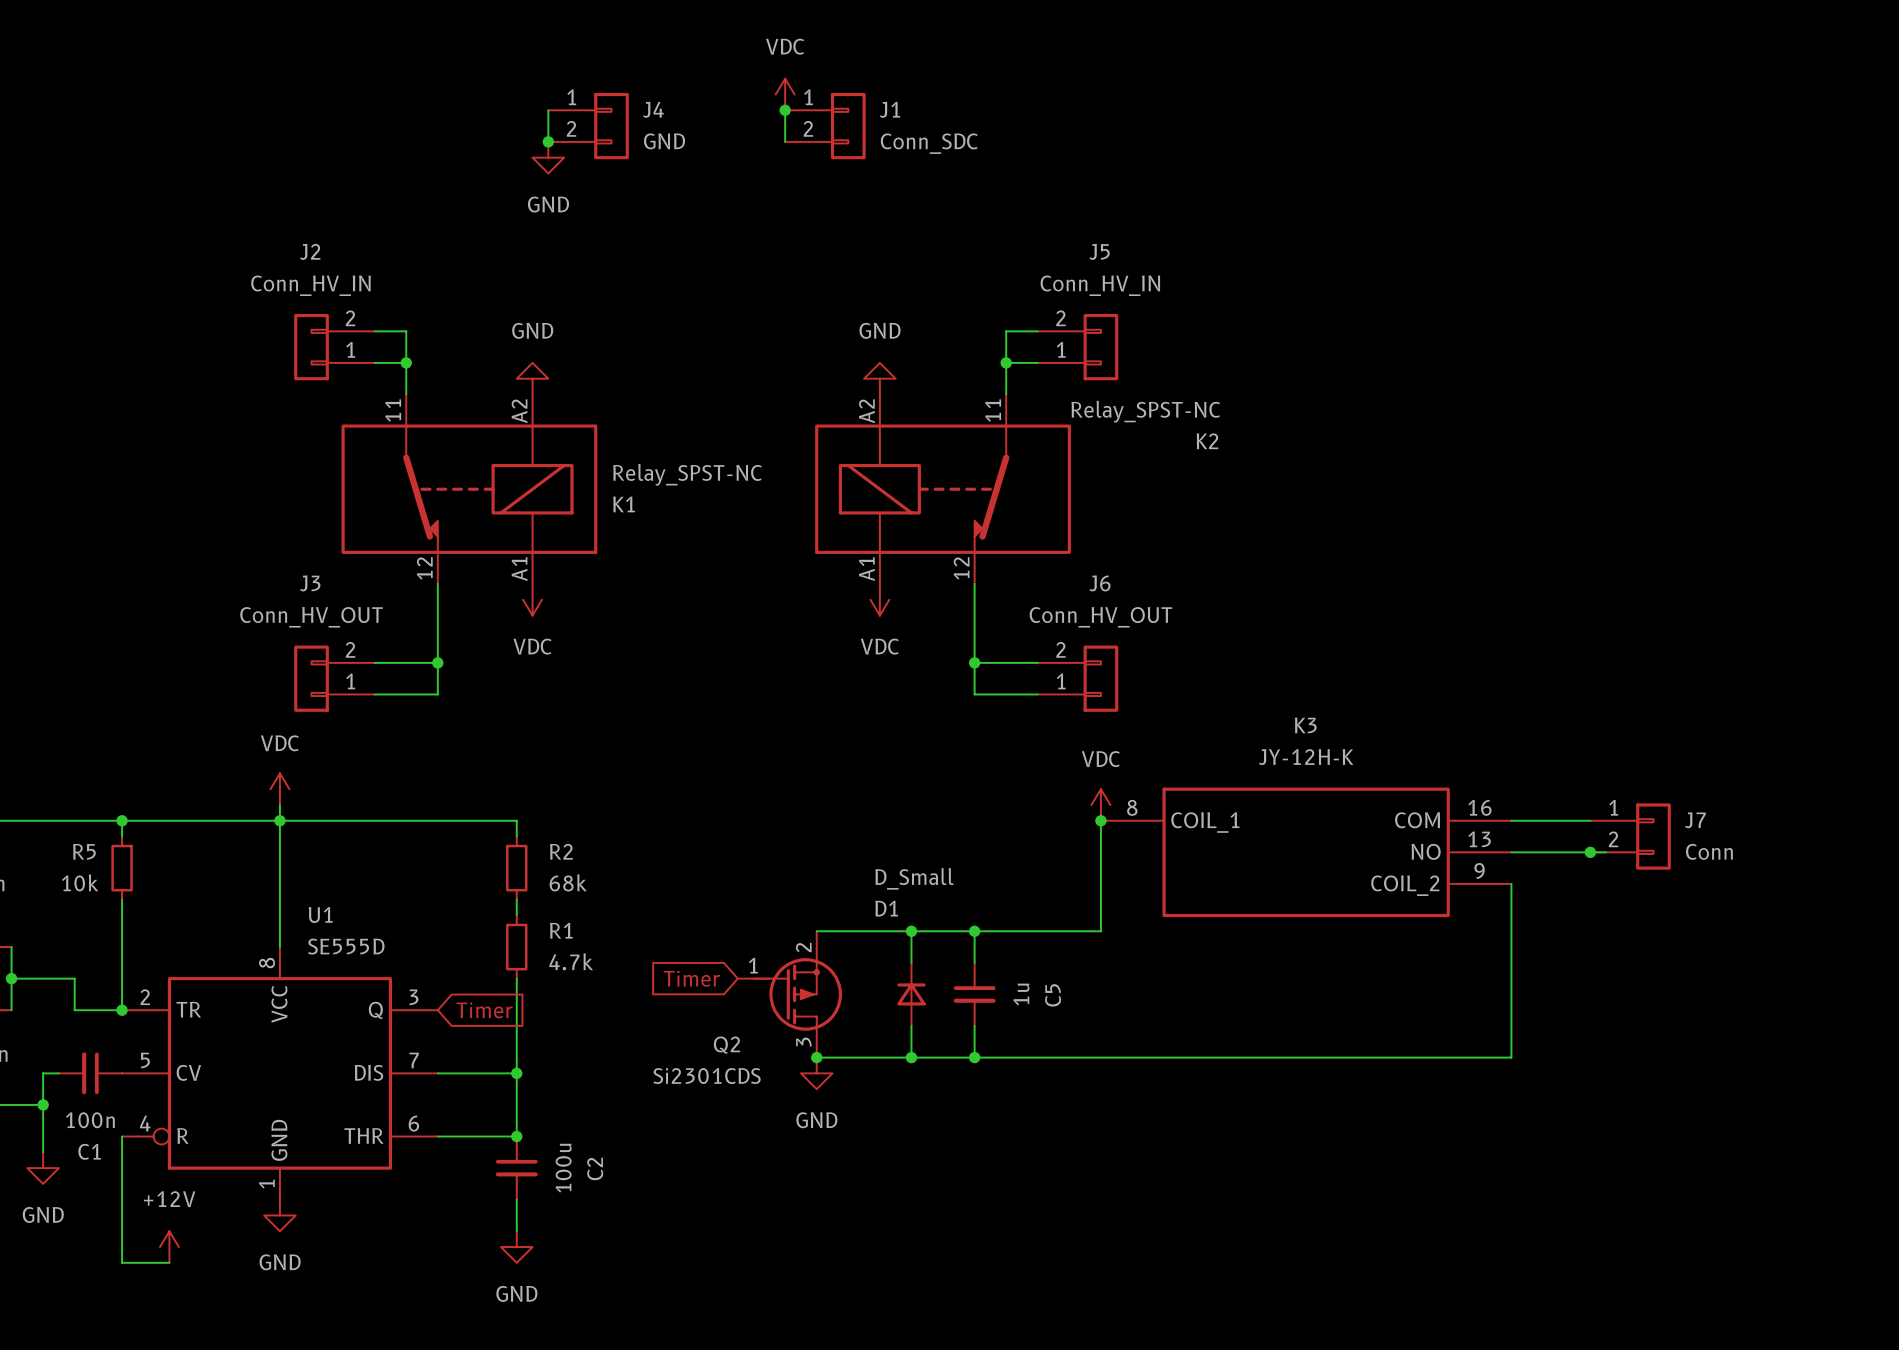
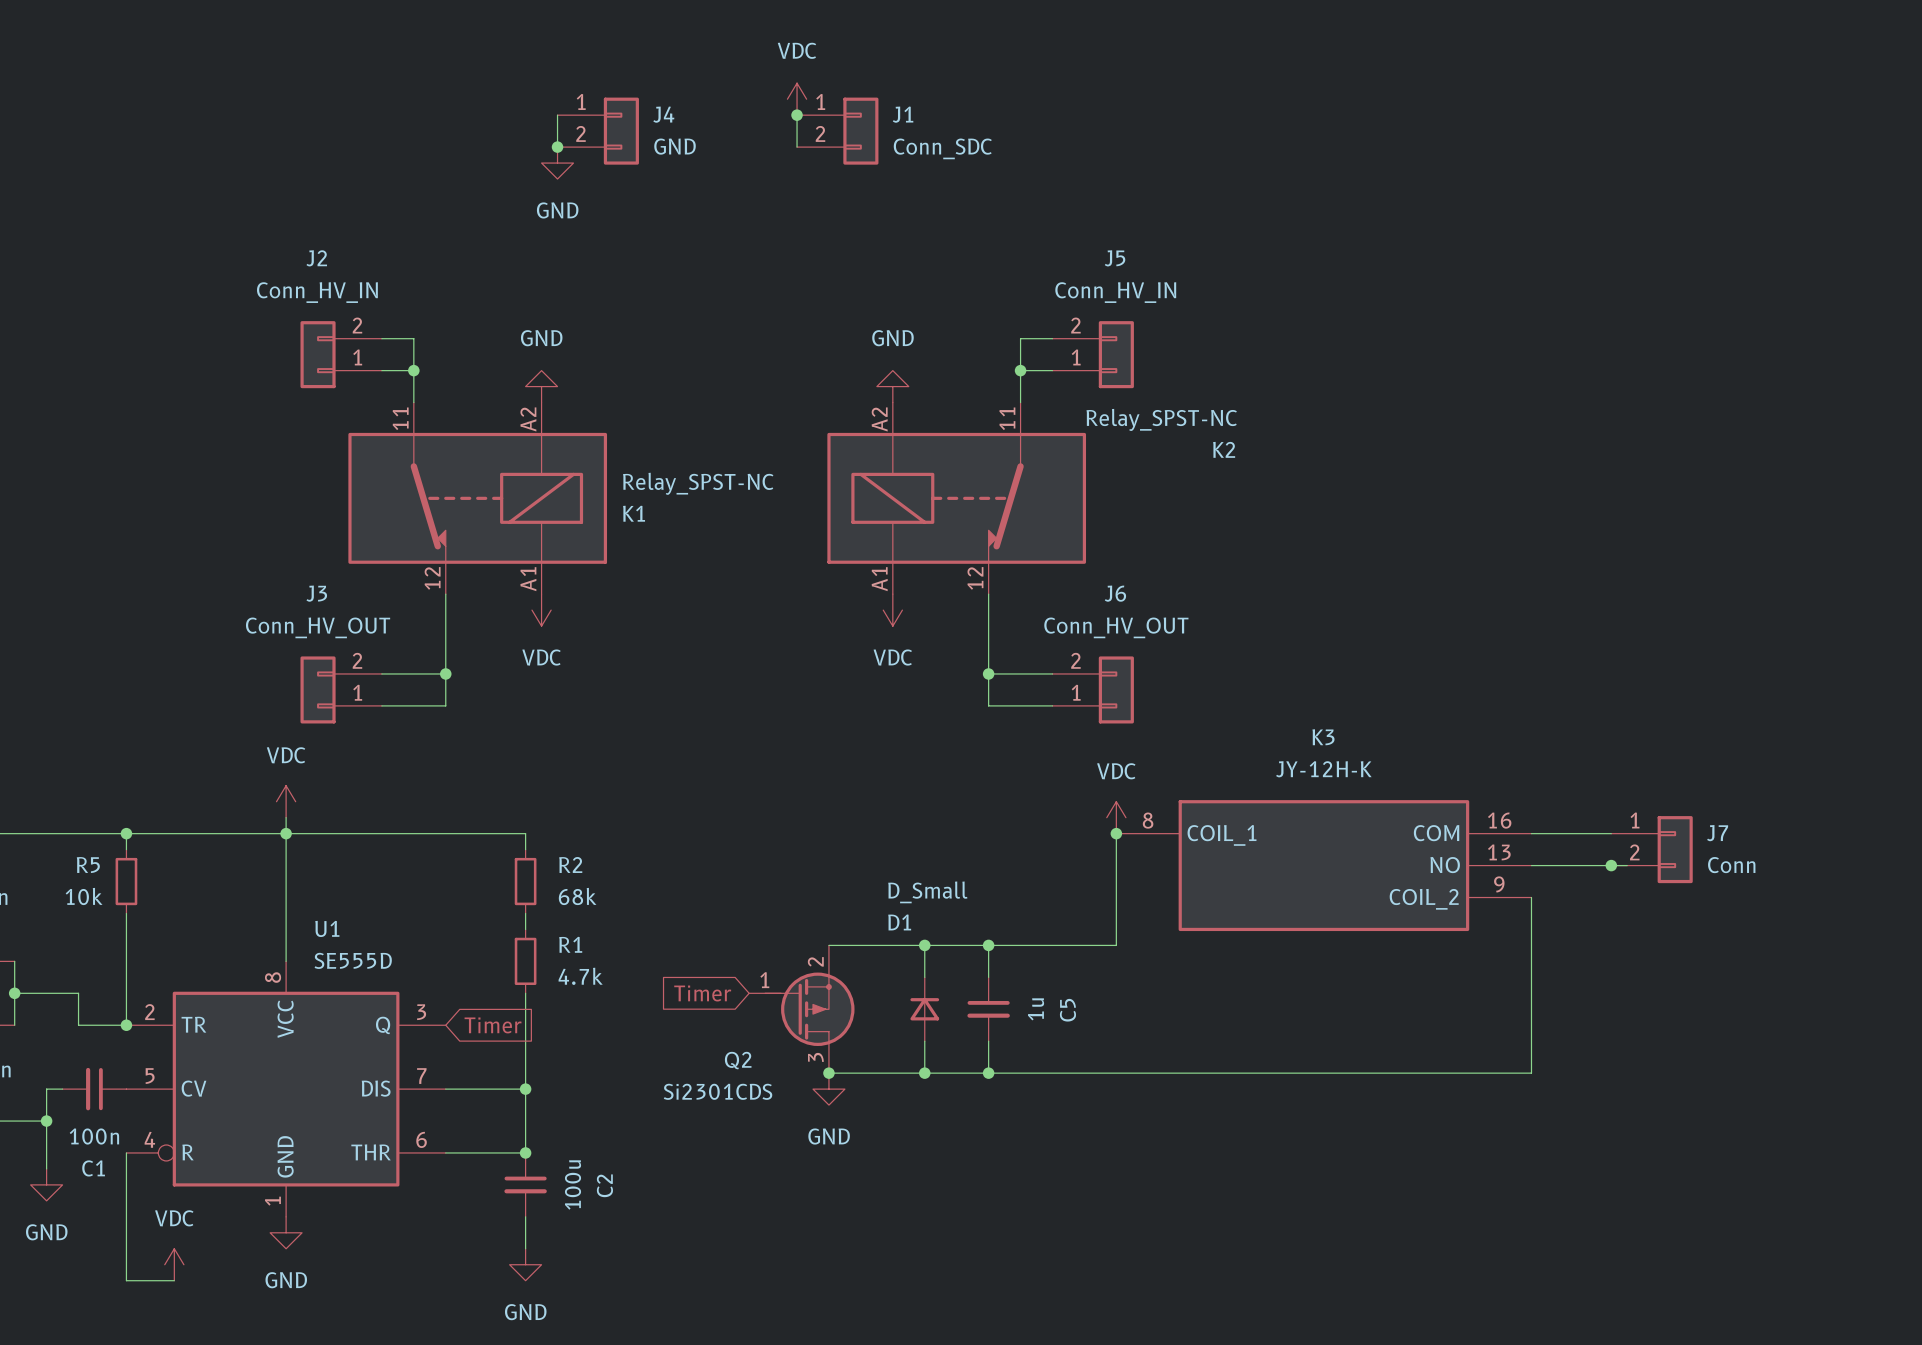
power symbol: +12V (169, 1247) -> VDC (174, 1264)

